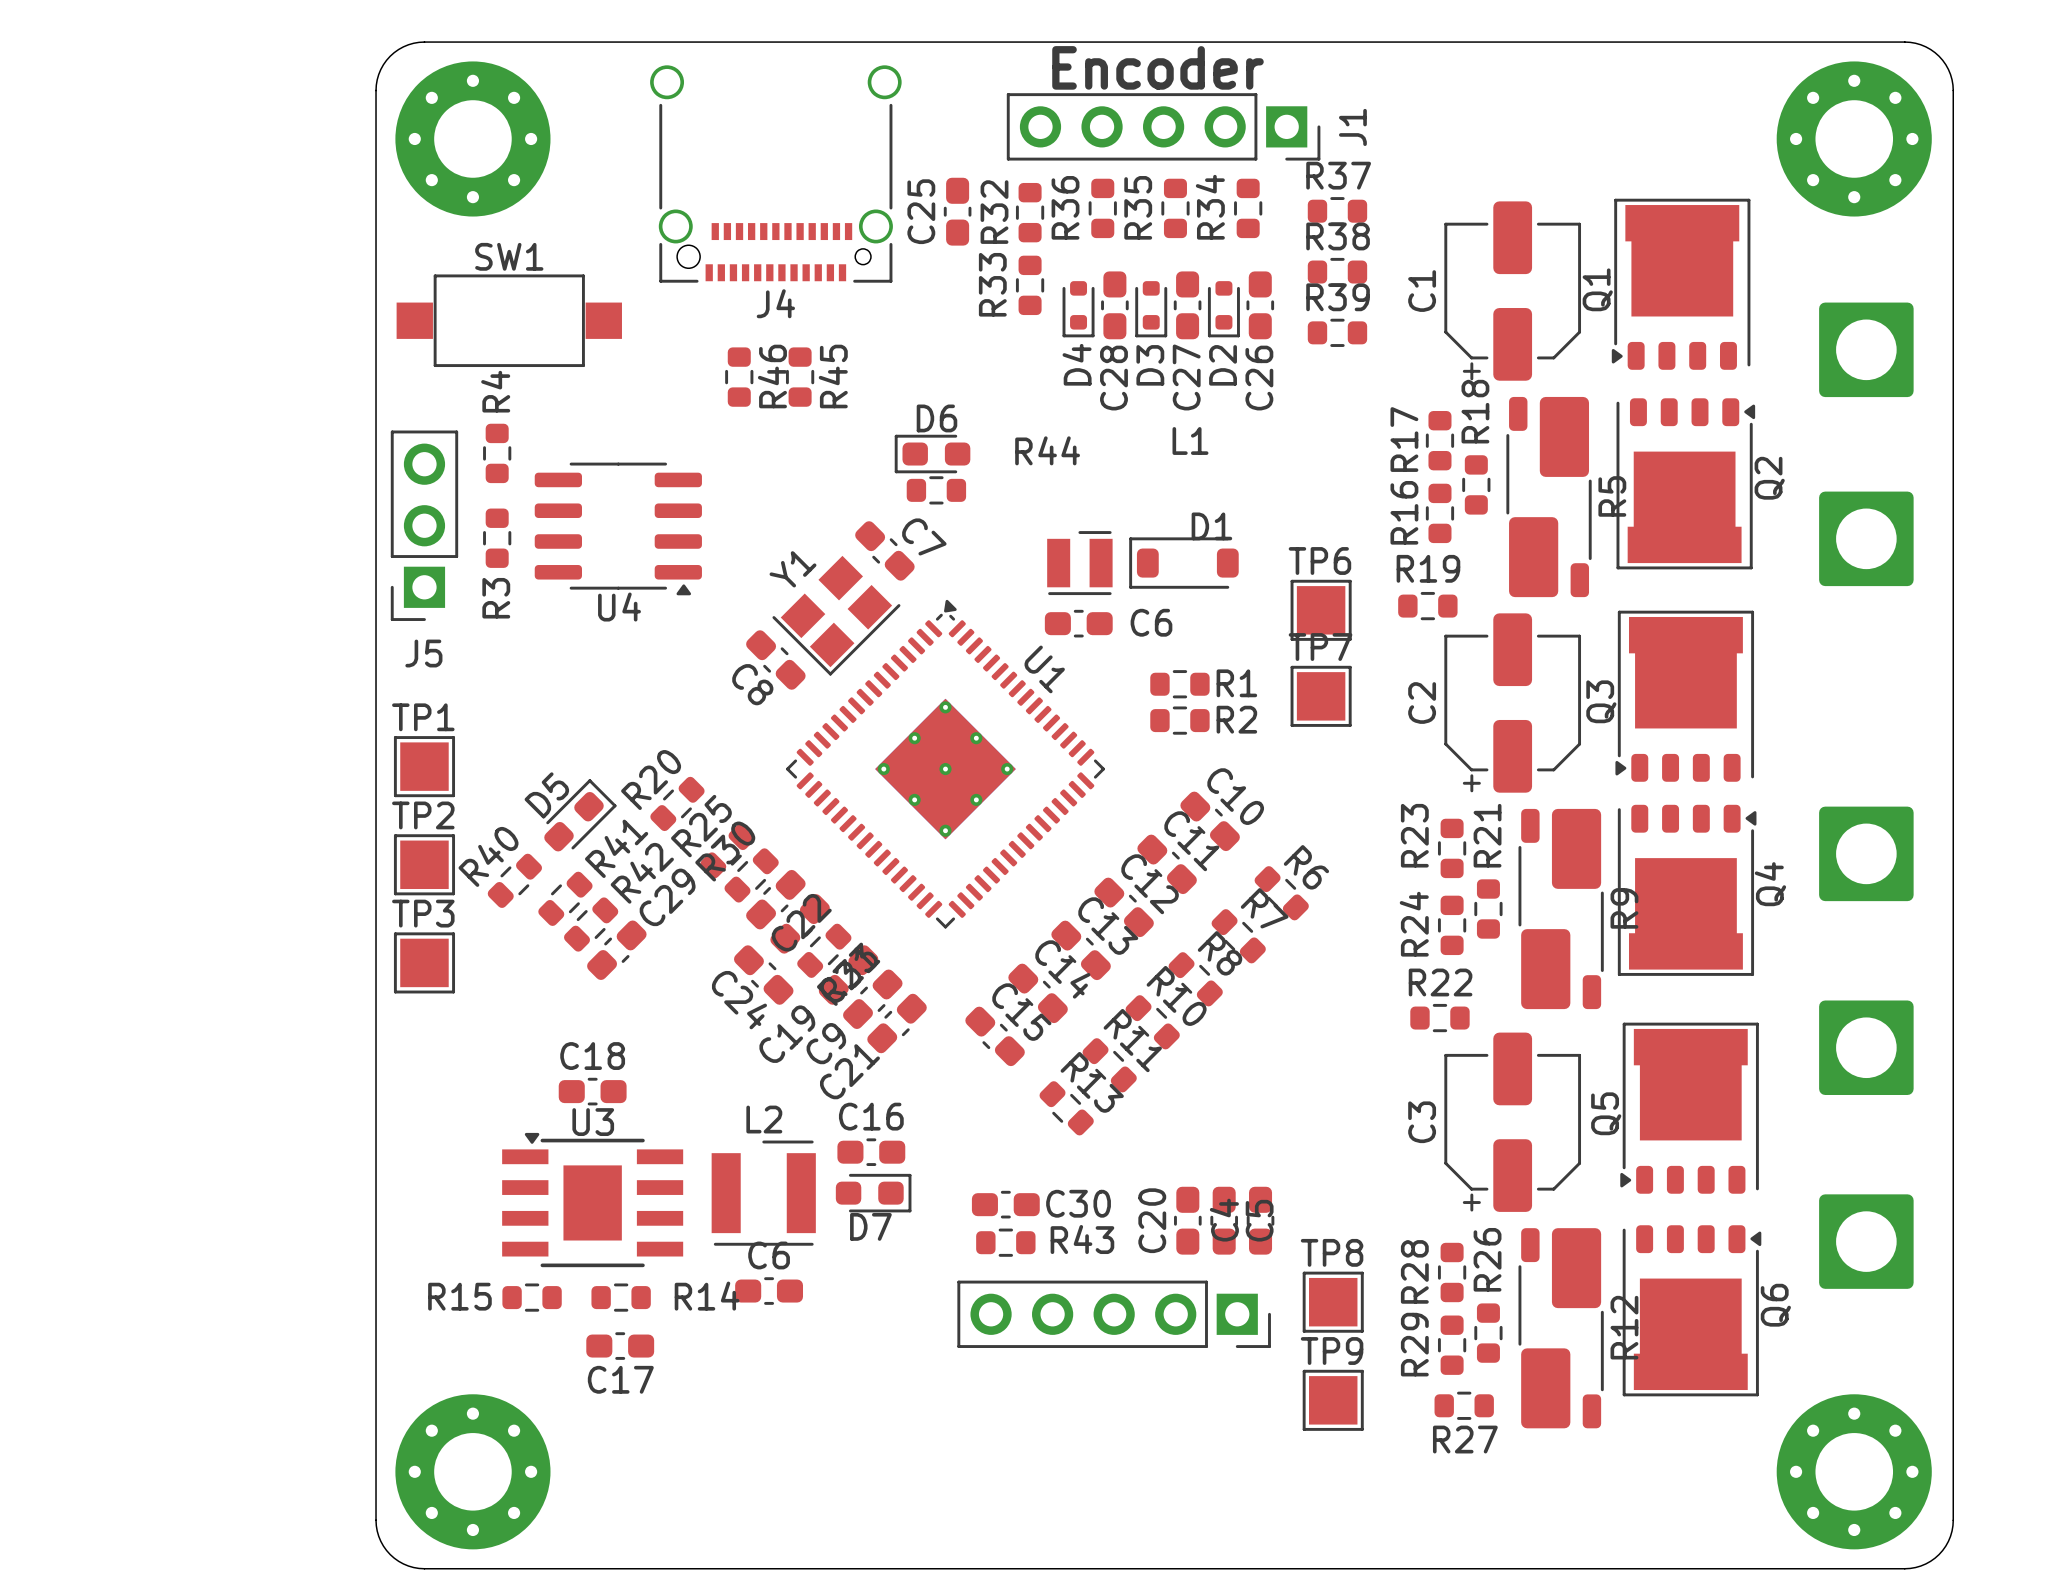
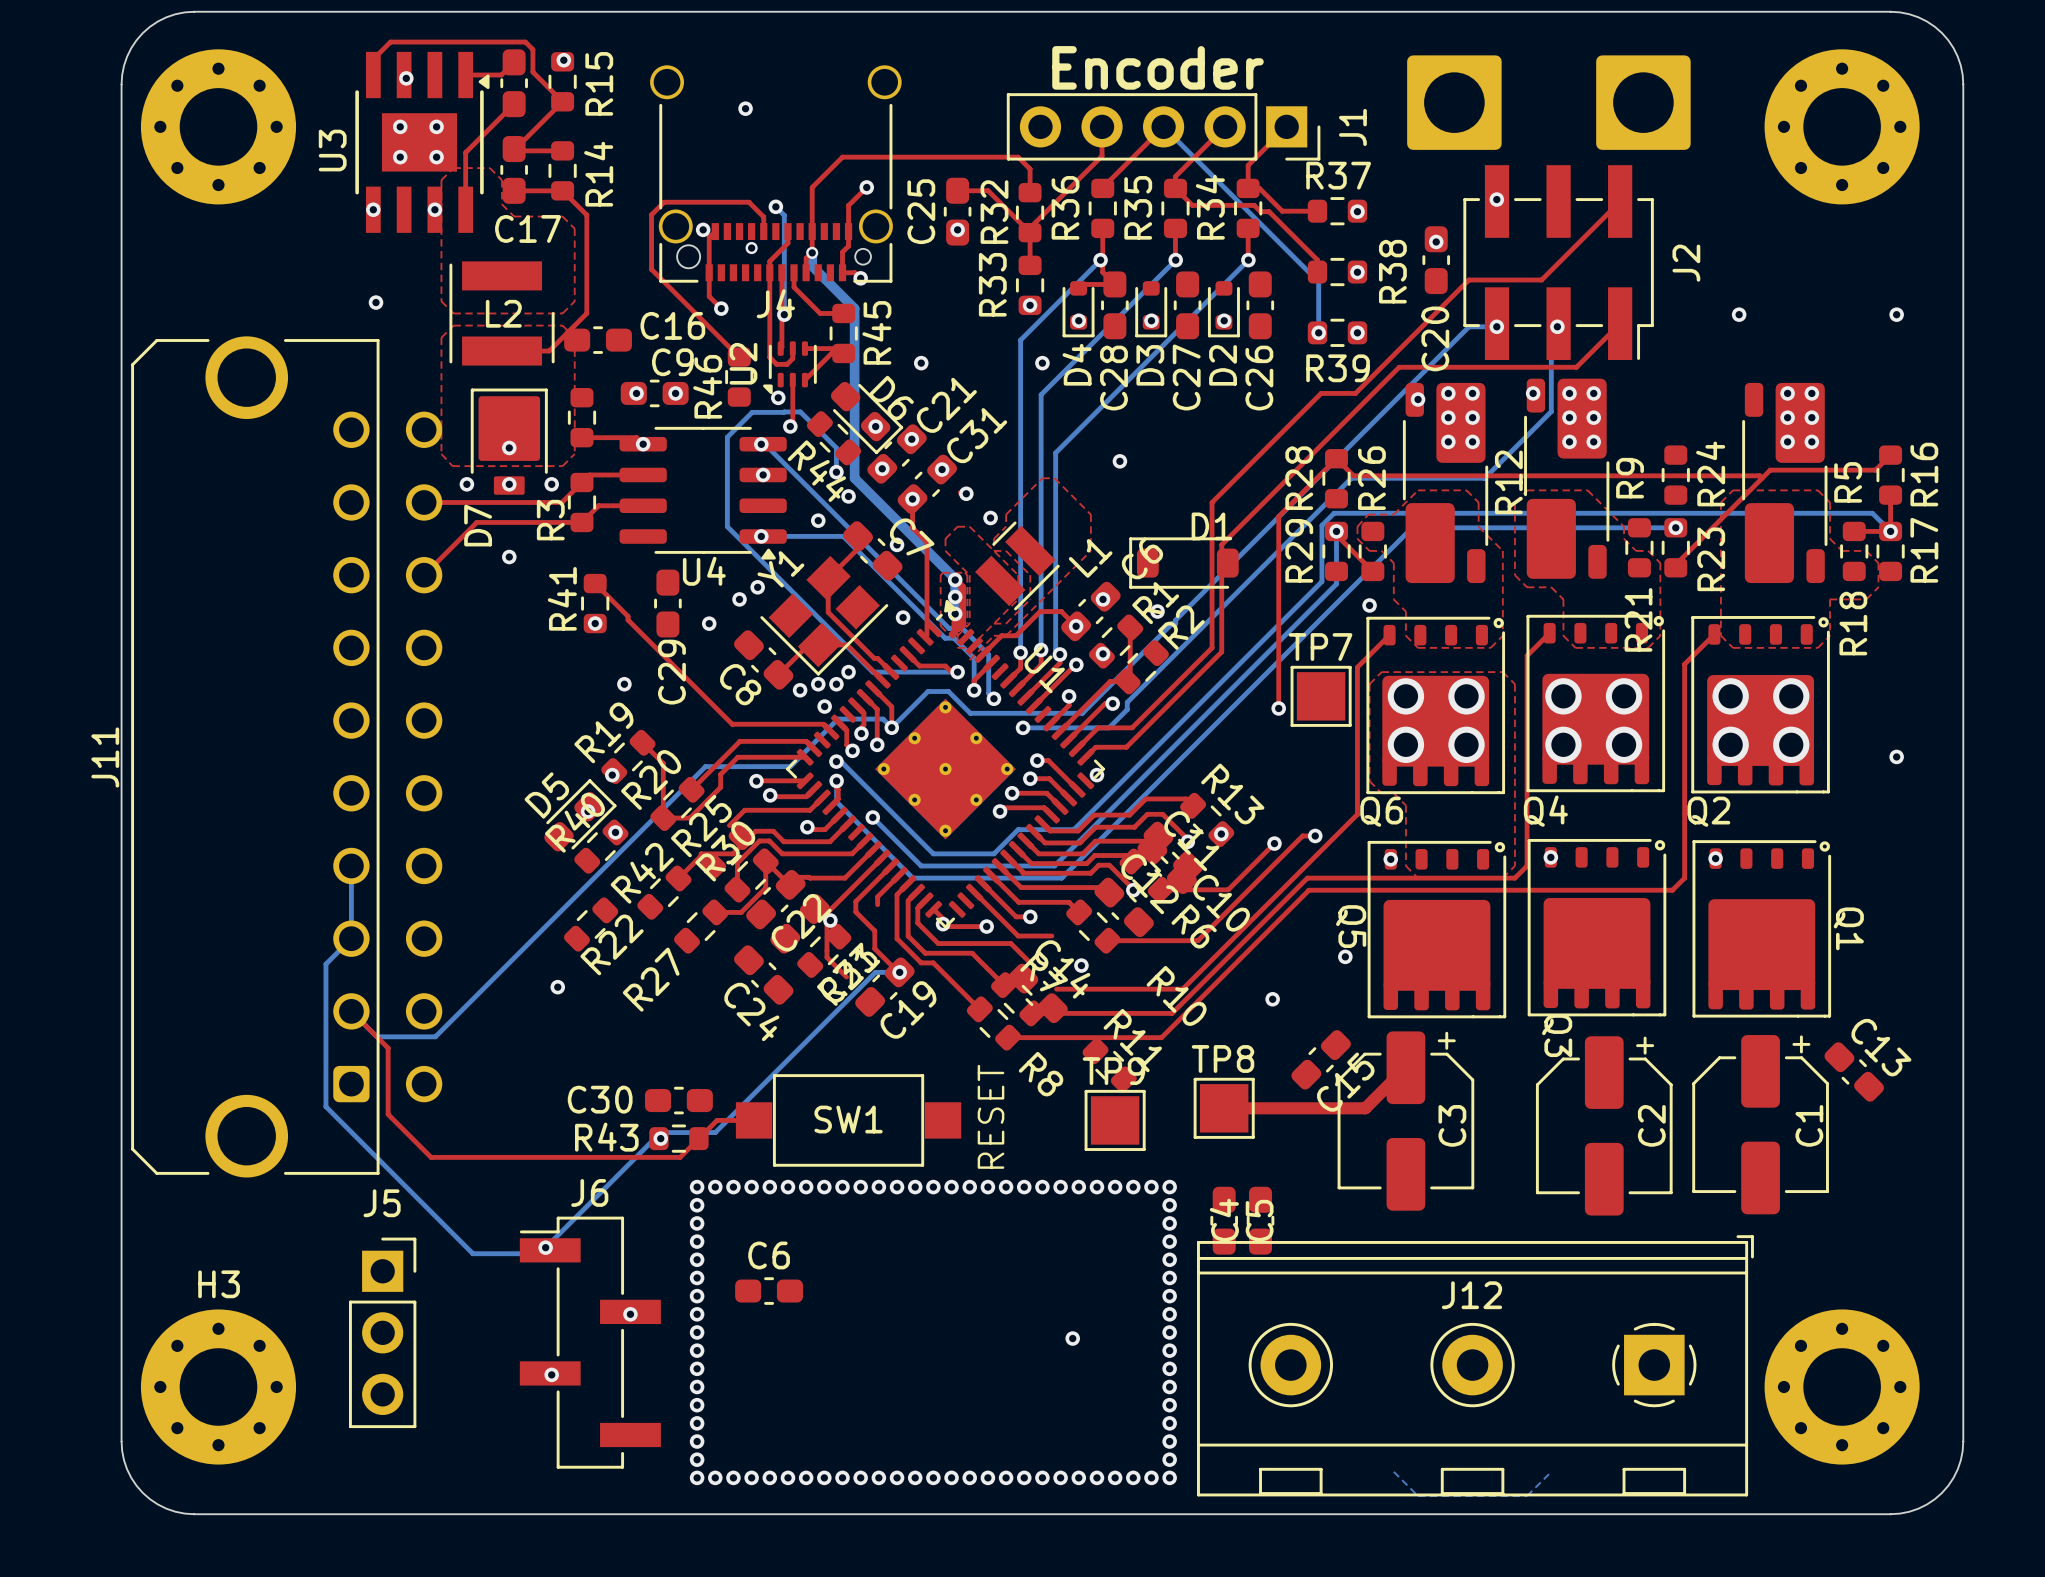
board edge: (424, 42) (1904, 42) (1925, 46) (1939, 56) (1950, 74) (1953, 90) (1953, 1520) (1948, 1541) (1939, 1554) (1925, 1563) (1904, 1568) (424, 1568) (403, 1563) (390, 1554) (380, 1541) (376, 1520) (376, 90) (380, 69) (390, 56) (403, 46) (424, 42) -> (194, 11) (166, 17) (142, 33) (127, 56) (121, 84) (121, 1441) (127, 1469) (136, 1485) (150, 1499) (166, 1508) (194, 1514) (1890, 1514) (1918, 1508) (1934, 1499) (1948, 1485) (1957, 1469) (1963, 1441) (1963, 84) (1960, 65) (1953, 48) (1934, 26) (1909, 14) (1890, 11) (194, 11)
via: none -> (563, 60)
top track: none -> (514, 62) (501, 75) (465, 75)
top track: none -> (373, 75) (373, 59) (390, 42) (525, 42) (532, 49) (532, 72) (562, 101) (514, 149) (515, 150) (562, 150)
via: none -> (406, 78)
part: none -> (514, 83)
part: none -> (1454, 102)
part: none -> (1643, 102)
top track: none -> (514, 104) (465, 152) (465, 209)
via: none -> (745, 108)
via: none -> (400, 126)
via: none -> (436, 126)
top track: none -> (1102, 126) (1102, 156) (1030, 227) (1030, 265)
top track: none -> (1163, 126) (1102, 188)
bottom track: none -> (1163, 126) (1318, 281) (1318, 332)
top track: none -> (1225, 126) (1175, 176) (1175, 188) (1192, 205) (1254, 205) (1260, 211) (1269, 211) (1317, 260) (1317, 272)
top track: none -> (1286, 126) (1248, 165) (1248, 188) (1259, 188) (1282, 211) (1317, 211)
part position: (472, 138) -> (218, 126)
part position: (1854, 138) -> (1842, 126)
via: none -> (400, 157)
via: none -> (436, 157)
top zone outline: none -> (453, 168) (489, 168) (502, 180) (502, 204) (514, 216) (562, 216) (574, 228) (574, 301) (562, 313) (453, 313) (441, 301) (441, 180) (453, 168)
top track: none -> (866, 187) (848, 205) (848, 246) (842, 252) (842, 272) (855, 272) (860, 278)
via: none -> (866, 187)
top track: none -> (514, 190) (562, 190) (586, 215) (586, 313) (549, 351) (502, 351)
top track: none -> (957, 190) (988, 190) (1030, 232)
top track: none -> (1030, 192) (1030, 169) (1018, 157) (842, 157) (812, 187) (812, 252) (806, 258) (806, 272)
Q1 footprint: [1611, 198, 1751, 370] -> [1692, 840, 1832, 1018]
via: none -> (1496, 199)
top track: none -> (1620, 201) (1541, 280) (1468, 280) (1355, 393) (1321, 393) (1212, 502) (1212, 647) (1132, 727) (1098, 727) (1077, 748)
bottom track: none -> (775, 206) (784, 215) (784, 314)
via: none -> (775, 206)
via: none -> (373, 209)
via: none -> (434, 209)
via: none -> (1357, 211)
top track: none -> (1102, 228) (1102, 257) (1100, 260) (1102, 262) (1102, 272) (1114, 284) (1082, 284) (1078, 288)
top track: none -> (1175, 228) (1175, 259)
top track: none -> (1248, 228) (1248, 259)
via: none -> (703, 229)
via: none -> (957, 229)
top track: none -> (715, 231) (709, 237) (709, 296) (721, 308)
top track: none -> (763, 231) (763, 217) (748, 202) (664, 202) (651, 214) (651, 269) (739, 357)
top track: none -> (787, 231) (787, 243) (769, 261) (769, 357) (776, 364) (787, 364) (792, 358) (792, 348)
R38 name rotation: 0° (1338, 236) -> 90° counterclockwise (1392, 271)
via: none -> (1436, 241)
via: none -> (751, 248)
bottom track: none -> (812, 252) (812, 266) (854, 308) (854, 478) (955, 578) (955, 613)
via: none -> (812, 252)
SW1 name position: SW1 (509, 256) -> SW1 (848, 1119)
bottom track: none -> (1100, 260) (1020, 340) (1020, 652)
via: none -> (1100, 260)
bottom track: none -> (1175, 260) (1041, 394) (1041, 649)
via: none -> (1175, 260)
bottom track: none -> (1248, 260) (1055, 452) (1055, 650) (1059, 654)
via: none -> (1248, 260)
J2: none -> (1558, 262)
top track: none -> (781, 272) (781, 312) (784, 314) (781, 317) (780, 348)
top track: none -> (794, 272) (794, 287) (820, 313) (843, 313)
via: none -> (1357, 272)
via: none -> (860, 278)
Q1 name position: Q1 (1597, 289) -> Q1 (1848, 928)
C1 rotation: 0° (1512, 291) -> 180° (1760, 1124)
C1 position: (1512, 291) -> (1760, 1124)
R39 name position: R39 (1338, 297) -> R39 (1338, 368)
via: none -> (376, 302)
via: none -> (1030, 305)
via: none -> (721, 308)
via: none -> (784, 314)
via: none -> (1739, 314)
via: none -> (1896, 314)
SW1 position: (509, 320) -> (848, 1120)
via: none -> (1078, 320)
via: none -> (1151, 320)
via: none -> (1224, 320)
top track: none -> (1620, 323) (1576, 367) (1399, 367) (1221, 544) (1221, 651) (1126, 747) (1095, 747) (1085, 757)
top zone outline: none -> (453, 325) (441, 337) (441, 454) (452, 466) (562, 466) (574, 454) (574, 337) (562, 325) (453, 325)
bottom track: none -> (1496, 326) (1468, 326) (1175, 620) (1175, 623) (1172, 623) (1082, 713) (970, 713) (948, 691) (927, 691) (891, 727) (883, 719) (837, 719) (790, 766) (705, 766) (435, 1036) (376, 1036) (351, 1011)
via: none -> (1496, 326)
bottom track: none -> (1557, 326) (1551, 332) (1551, 411) (1484, 478) (1351, 478) (1127, 702) (1127, 709) (1109, 727) (1023, 727)
via: none -> (1557, 326)
via: none -> (1318, 332)
via: none -> (1357, 332)
top track: none -> (804, 348) (838, 348) (843, 353) (831, 353) (804, 380)
part: (1866, 349) -> none
via: none -> (921, 363)
via: none -> (1042, 363)
U2: none -> (789, 367)
R46 name position: R46 (772, 376) -> R46 (707, 386)
R45 position: (800, 377) -> (843, 333)
top track: none -> (792, 380) (792, 423) (790, 426)
via: none -> (636, 393)
via: none -> (675, 393)
via: none -> (1448, 393)
via: none -> (1472, 393)
via: none -> (1533, 393)
via: none -> (1569, 393)
via: none -> (1593, 393)
via: none -> (1787, 393)
via: none -> (1811, 393)
via: none -> (778, 397)
Q2 footprint: [1616, 398, 1756, 570] -> [1691, 616, 1830, 794]
via: none -> (1418, 399)
R18 name position: R18 (1475, 411) -> R18 (1853, 623)
part: none -> (581, 417)
via: none -> (1448, 417)
via: none -> (1472, 417)
via: none -> (1569, 417)
via: none -> (1593, 417)
via: none -> (1787, 417)
via: none -> (1811, 417)
via: none -> (790, 426)
via: none -> (875, 426)
top track: none -> (581, 437) (636, 437) (643, 444)
via: none -> (911, 439)
R17 name position: R17 (1404, 439) -> R17 (1924, 550)
L1 name position: L1 (1190, 440) -> L1 (1090, 558)
R17 position: (1439, 440) -> (1890, 551)
via: none -> (1448, 441)
via: none -> (1472, 441)
via: none -> (1569, 441)
via: none -> (1593, 441)
via: none -> (1787, 441)
via: none -> (1811, 441)
via: none -> (643, 444)
bottom track: none -> (761, 444) (764, 444) (949, 628) (962, 628) (988, 654) (988, 693) (993, 698)
via: none -> (761, 444)
via: none -> (509, 447)
R44 name position: R44 (1047, 450) -> R44 (816, 471)
R4: (497, 453) -> none
D6 rotation: 0° (932, 454) -> 135° counterclockwise (867, 417)
D6 position: (932, 454) -> (867, 417)
top track: none -> (1890, 455) (1875, 470) (1770, 470) (1675, 564) (1675, 567)
via: none -> (1119, 461)
via: none -> (882, 468)
via: none -> (942, 469)
bottom track: none -> (836, 472) (836, 447) (800, 411) (752, 412) (727, 437) (727, 526) (872, 672) (957, 672)
via: none -> (836, 472)
top track: none -> (643, 474) (589, 474) (562, 502) (424, 502)
via: none -> (763, 474)
top track: none -> (1762, 478) (1759, 475) (1353, 475) (1336, 458) (1278, 516) (1278, 708)
Q2 name position: Q2 (1769, 478) -> Q2 (1708, 811)
via: none -> (466, 484)
via: none -> (509, 484)
via: none -> (551, 484)
C31: none -> (927, 484)
R18 position: (1476, 484) -> (1854, 551)
R44 rotation: 0° (936, 490) -> 45° clockwise (834, 438)
R44 position: (936, 490) -> (834, 438)
top zone outline: none -> (1418, 490) (1466, 490) (1478, 502) (1478, 526) (1502, 550) (1502, 635) (1490, 647) (1418, 647) (1405, 635) (1405, 611) (1393, 599) (1393, 563) (1381, 550) (1369, 550) (1357, 538) (1357, 526) (1368, 514) (1393, 514) (1418, 490)
top zone outline: none -> (1527, 490) (1587, 490) (1624, 526) (1624, 538) (1636, 550) (1648, 550) (1660, 563) (1660, 635) (1648, 647) (1575, 647) (1563, 635) (1563, 599) (1551, 587) (1527, 587) (1514, 575) (1514, 502) (1527, 490)
top zone outline: none -> (1733, 490) (1720, 502) (1720, 635) (1733, 647) (1817, 647) (1830, 635) (1830, 599) (1866, 599) (1878, 587) (1878, 563) (1866, 550) (1842, 550) (1830, 538) (1830, 502) (1817, 490) (1733, 490)
via: none -> (966, 493)
top track: none -> (1890, 495) (1890, 531) (1854, 531)
via: none -> (848, 496)
R5 position: (1549, 497) -> (1784, 482)
top track: none -> (912, 499) (912, 527) (927, 542) (927, 635)
via: none -> (912, 499)
top track: none -> (643, 505) (598, 505) (581, 522) (476, 522) (424, 575)
R16 name position: R16 (1404, 512) -> R16 (1924, 474)
R16 position: (1439, 513) -> (1890, 475)
via: none -> (990, 517)
via: none -> (818, 520)
J5 rotation: 0° (424, 525) -> 180° (382, 1332)
J5 position: (424, 525) -> (382, 1332)
bottom track: none -> (1675, 527) (1412, 527) (1061, 878) (912, 878) (836, 801) (836, 780)
via: none -> (1675, 527)
U4 position: (618, 528) -> (703, 493)
top track: none -> (1336, 531) (1336, 535) (1372, 571)
bottom track: none -> (1336, 531) (1336, 584) (1054, 865) (921, 865) (872, 817)
via: none -> (1336, 531)
bottom track: none -> (1890, 531) (1872, 513) (1334, 513) (1321, 525) (1321, 581) (1073, 829) (1018, 829) (993, 853) (933, 853) (841, 761) (836, 761)
via: none -> (1890, 531)
bottom track: none -> (761, 536) (843, 536) (945, 638) (953, 638) (974, 658) (974, 690)
via: none -> (761, 536)
top track: none -> (858, 536) (858, 548) (828, 578) (828, 612) (874, 658) (877, 658) (890, 671)
R3 position: (497, 538) -> (581, 502)
part: (1866, 538) -> none
via: none -> (897, 544)
C7 position: (884, 550) -> (872, 550)
via: none -> (509, 557)
L1 rotation: 0° (1079, 563) -> 45° counterclockwise (1017, 565)
L1 position: (1079, 563) -> (1017, 565)
top zone outline: none -> (943, 572) (964, 572) (967, 575) (967, 623) (952, 638) (940, 626) (940, 575) (943, 572)
top track: none -> (955, 580) (962, 587) (962, 623) (957, 628) (955, 626) (955, 613)
via: none -> (955, 580)
top track: none -> (595, 583) (628, 616) (628, 620) (732, 724) (823, 724) (830, 731)
via: none -> (757, 587)
via: none -> (955, 596)
R3 name position: R3 (496, 598) -> R3 (550, 520)
via: none -> (739, 599)
via: none -> (1103, 599)
via: none -> (1369, 605)
R19 rotation: 0° (1427, 606) -> 45° counterclockwise (628, 756)
R19 position: (1427, 606) -> (628, 756)
TP6: (1321, 610) -> none
Q3 footprint: [1615, 610, 1755, 782] -> [1527, 838, 1667, 1017]
via: none -> (1157, 611)
via: none -> (955, 613)
Y1 position: (836, 615) -> (824, 615)
via: none -> (903, 617)
via: none -> (595, 623)
via: none -> (709, 623)
top zone outline: none -> (993, 623) (1006, 623) (1030, 599) (1030, 575) (1006, 550) (993, 550) (993, 538) (1006, 526) (1006, 514) (1042, 478) (1054, 478) (1090, 514) (1090, 550) (1006, 635) (993, 635) (969, 660) (969, 647)
C6 rotation: 0° (1078, 623) -> 45° counterclockwise (1090, 611)
top track: none -> (1076, 626) (1061, 611) (1040, 611) (1015, 635) (1001, 635) (982, 654)
via: none -> (1076, 626)
top track: none -> (1130, 627) (1130, 676) (1127, 681) (1110, 681) (1060, 731)
top track: none -> (1549, 633) (1527, 655) (1527, 865) (1514, 878) (1307, 878) (1172, 1013) (1032, 1013)
top track: none -> (1714, 634) (1684, 664) (1684, 878) (1672, 890) (1308, 890) (1161, 1037) (1008, 1037)
top track: none -> (1389, 635) (1357, 667) (1357, 814) (1182, 989) (1056, 989)
top zone outline: none -> (969, 647) (957, 647) (957, 635) (969, 623) (969, 575) (945, 550) (945, 538) (957, 526) (969, 526) (1018, 575) (1018, 599) (969, 647)
top track: none -> (1041, 649) (1041, 664) (1017, 688)
via: none -> (1041, 649)
top track: none -> (1020, 652) (1020, 668) (1008, 680)
via: none -> (1020, 652)
via: none -> (1103, 653)
top track: none -> (908, 654) (919, 666) (945, 666) (951, 672) (957, 672)
top track: none -> (1059, 654) (1059, 663) (1025, 697)
via: none -> (1059, 654)
C8 position: (775, 660) -> (763, 660)
top track: none -> (991, 663) (974, 680) (974, 690)
top track: none -> (1076, 664) (1034, 705)
via: none -> (1076, 664)
via: none -> (848, 672)
via: none -> (957, 672)
top zone outline: none -> (1381, 672) (1502, 672) (1514, 684) (1514, 865) (1502, 878) (1418, 878) (1405, 865) (1405, 805) (1393, 793) (1381, 793) (1369, 781) (1369, 684) (1381, 672)
top track: none -> (778, 674) (808, 644) (847, 644) (882, 680)
via: none -> (624, 684)
via: none -> (818, 684)
via: none -> (836, 684)
R1 rotation: 0° (1179, 684) -> 45° counterclockwise (1116, 641)
R1 position: (1179, 684) -> (1116, 641)
top track: none -> (873, 688) (891, 706) (891, 727)
via: none -> (800, 690)
via: none -> (974, 690)
top track: none -> (1069, 696) (1069, 705) (1051, 723)
via: none -> (1069, 696)
via: none -> (1405, 696)
via: none -> (1466, 696)
via: none -> (1563, 696)
via: none -> (1624, 696)
via: none -> (1730, 696)
via: none -> (1791, 696)
top track: none -> (865, 697) (877, 709) (877, 744)
via: none -> (993, 698)
Q3 name position: Q3 (1601, 701) -> Q3 (1557, 1035)
top track: none -> (1112, 703) (1105, 703) (1068, 740)
via: none -> (1112, 703)
C2 rotation: 0° (1512, 703) -> 180° (1604, 1125)
C2 position: (1512, 703) -> (1604, 1125)
top track: none -> (856, 705) (863, 713) (861, 733)
via: none -> (824, 706)
via: none -> (1278, 708)
R2 rotation: 0° (1179, 720) -> 45° counterclockwise (1141, 667)
R2 position: (1179, 720) -> (1141, 667)
top track: none -> (839, 723) (846, 730) (846, 745) (852, 750)
via: none -> (891, 727)
via: none -> (1023, 727)
via: none -> (861, 733)
top track: none -> (642, 742) (663, 763) (663, 818) (689, 818) (720, 787) (720, 774) (737, 757) (805, 757)
via: none -> (877, 744)
via: none -> (1405, 744)
via: none -> (1466, 744)
via: none -> (1563, 744)
via: none -> (1624, 744)
via: none -> (1730, 744)
via: none -> (1791, 744)
top track: none -> (813, 748) (806, 741) (740, 741) (691, 789)
via: none -> (852, 750)
J11: none -> (286, 756)
via: none -> (1896, 756)
via: none -> (1037, 760)
via: none -> (836, 761)
top track: none -> (1036, 762) (1037, 760) (1048, 760) (1077, 789)
TP1: (424, 766) -> none
via: none -> (612, 775)
via: none -> (1096, 775)
top track: none -> (1030, 778) (1049, 778) (1068, 797)
via: none -> (1030, 778)
top track: none -> (756, 780) (805, 780)
top track: none -> (836, 780) (838, 799) (830, 806)
via: none -> (836, 780)
via: none -> (756, 781)
top track: none -> (813, 789) (806, 796) (770, 795) (771, 798)
top track: none -> (1012, 793) (1046, 793) (1060, 806)
via: none -> (1012, 793)
via: none -> (770, 795)
C10 name position: C10 (1235, 796) -> C10 (1221, 903)
top track: none -> (822, 797) (810, 810) (744, 810) (729, 825)
Q4 footprint: [1617, 804, 1757, 976] -> [1526, 614, 1666, 793]
top track: none -> (1193, 805) (1186, 798) (1145, 798) (1129, 815) (1094, 815) (1078, 830) (1050, 830) (1042, 823)
via: none -> (588, 811)
top track: none -> (1000, 811) (1003, 807) (1044, 807) (1051, 815)
via: none -> (1000, 811)
top track: none -> (839, 815) (824, 829) (807, 827) (812, 829)
via: none -> (872, 817)
C10 position: (1210, 821) -> (1173, 851)
top track: none -> (848, 823) (829, 841) (783, 841) (773, 831) (755, 831) (732, 853) (701, 853) (678, 878)
via: none -> (807, 827)
via: none -> (615, 832)
top track: none -> (1034, 832) (1045, 842) (1079, 842) (1095, 827) (1134, 827) (1147, 814) (1162, 814) (1188, 841)
via: none -> (1221, 834)
top track: none -> (1315, 835) (1302, 835) (1197, 940) (1107, 940)
via: none -> (1315, 835)
R23 name position: R23 (1414, 835) -> R23 (1711, 559)
R21 name position: R21 (1487, 835) -> R21 (1638, 619)
top track: none -> (1158, 836) (1153, 841) (1095, 841) (1082, 853) (1038, 853) (1025, 840)
top track: none -> (865, 840) (852, 853) (782, 853) (769, 840) (759, 840) (737, 863) (737, 889)
via: none -> (1187, 841)
top track: none -> (1274, 843) (1228, 889) (1160, 889)
via: none -> (1274, 843)
R41 name position: R41 (616, 848) -> R41 (562, 598)
R23 position: (1452, 848) -> (1675, 547)
top track: none -> (873, 849) (845, 878) (782, 878) (765, 861) (765, 887) (741, 912) (715, 912)
top track: none -> (1017, 849) (1031, 863) (1086, 863) (1094, 855) (1126, 855) (1132, 861)
part: (1866, 853) -> none
top track: none -> (882, 857) (826, 913) (826, 957) (846, 977)
top track: none -> (1008, 857) (1023, 873) (1090, 873) (1098, 865) (1109, 865) (1134, 890)
via: none -> (1550, 857)
via: none -> (1715, 858)
via: none -> (1390, 859)
TP2: (424, 864) -> none
bottom track: none -> (351, 865) (351, 938) (325, 964) (325, 1106) (472, 1253) (539, 1253) (654, 1138) (660, 1138) (666, 1132) (715, 1132) (875, 972) (899, 972)
top track: none -> (890, 866) (855, 901) (855, 912) (874, 931) (874, 948) (899, 972)
top track: none -> (1000, 866) (1021, 887) (1105, 887)
R6 name position: R6 (1306, 867) -> R6 (1194, 926)
top track: none -> (899, 875) (877, 896) (877, 904)
top track: none -> (991, 875) (1018, 902) (1069, 902) (1079, 912)
R40 position: (514, 880) -> (601, 846)
top track: none -> (908, 883) (897, 894) (897, 938) (921, 962) (933, 962) (979, 1009)
top track: none -> (982, 883) (1016, 916) (1030, 916)
Q4 name position: Q4 (1770, 884) -> Q4 (1545, 811)
via: none -> (1133, 890)
top track: none -> (916, 892) (908, 900) (908, 936) (925, 953) (972, 953) (1004, 985)
top track: none -> (974, 892) (1018, 936) (1051, 936)
R6 position: (1281, 893) -> (1146, 875)
C29 name position: C29 (667, 897) -> C29 (671, 672)
R41 rotation: 0° (565, 898) -> 45° counterclockwise (595, 603)
R41 position: (565, 898) -> (595, 603)
top track: none -> (925, 900) (917, 908) (917, 923) (938, 943) (1010, 943) (1028, 960)
top track: none -> (933, 909) (943, 918) (943, 924) (945, 926) (986, 926)
R21 position: (1488, 909) -> (1639, 547)
R9 position: (1561, 909) -> (1566, 478)
via: none -> (1030, 916)
via: none -> (830, 920)
via: none -> (943, 924)
R24 name position: R24 (1414, 924) -> R24 (1710, 473)
R24 position: (1452, 925) -> (1675, 475)
via: none -> (986, 926)
R7 position: (1238, 936) -> (1018, 999)
C29 rotation: 0° (616, 950) -> 45° counterclockwise (667, 603)
C29 position: (616, 950) -> (667, 603)
C13 position: (1081, 950) -> (1854, 1071)
R8 name position: R8 (1220, 953) -> R8 (1041, 1074)
via: none -> (1345, 956)
TP3: (424, 962) -> none
via: none -> (1081, 965)
via: none -> (899, 972)
C19 position: (848, 975) -> (884, 987)
R8 position: (1195, 979) -> (993, 1023)
R22 name position: R22 (1440, 982) -> R22 (612, 944)
via: none -> (557, 987)
C9 rotation: 0° (872, 999) -> 45° clockwise (654, 393)
C9 position: (872, 999) -> (654, 393)
via: none -> (1272, 999)
C24 name position: C24 (739, 1000) -> C24 (751, 1011)
top track: none -> (351, 1011) (388, 1048) (388, 1114) (431, 1157) (680, 1157) (717, 1120) (754, 1120)
R22 rotation: 0° (1439, 1018) -> 45° counterclockwise (664, 892)
R22 position: (1439, 1018) -> (664, 892)
R10 position: (1152, 1022) -> (1093, 926)
Q5 footprint: [1620, 1022, 1759, 1194] -> [1367, 840, 1507, 1019]
C21 position: (897, 1023) -> (897, 454)
C19 name position: C19 (787, 1034) -> C19 (908, 1009)
C15 rotation: 0° (995, 1036) -> 90° clockwise (1321, 1059)
C15 position: (995, 1036) -> (1321, 1059)
C9 name position: C9 (826, 1043) -> C9 (672, 362)
part: (1866, 1047) -> none
top track: none -> (1405, 1067) (1365, 1108) (1224, 1108)
C21 name position: C21 (849, 1071) -> C21 (946, 405)
C18: (592, 1091) -> none
R13 position: (1066, 1108) -> (1207, 819)
C16 name position: C16 (871, 1116) -> C16 (672, 325)
text: none -> RESET (990, 1116)
L2 name position: L2 (764, 1119) -> L2 (503, 313)
U3 name position: U3 (593, 1122) -> U3 (332, 150)
C3 rotation: 0° (1512, 1122) -> 180° (1405, 1121)
via: none -> (660, 1138)
C16 position: (871, 1152) -> (598, 340)
D7 footprint: [835, 1173, 912, 1213] -> [470, 388, 548, 495]
via: none -> (697, 1187)
via: none -> (715, 1187)
via: none -> (733, 1187)
via: none -> (751, 1187)
via: none -> (769, 1187)
via: none -> (787, 1187)
via: none -> (806, 1187)
via: none -> (824, 1187)
via: none -> (842, 1187)
via: none -> (860, 1187)
via: none -> (878, 1187)
via: none -> (897, 1187)
via: none -> (915, 1187)
via: none -> (933, 1187)
via: none -> (951, 1187)
via: none -> (969, 1187)
via: none -> (987, 1187)
via: none -> (1006, 1187)
via: none -> (1024, 1187)
via: none -> (1042, 1187)
via: none -> (1060, 1187)
via: none -> (1078, 1187)
via: none -> (1096, 1187)
via: none -> (1115, 1187)
via: none -> (1133, 1187)
via: none -> (1151, 1187)
via: none -> (1169, 1187)
L2 rotation: 0° (763, 1193) -> 90° clockwise (502, 313)
L2 position: (763, 1193) -> (502, 313)
U3 rotation: 0° (592, 1200) -> 90° clockwise (422, 142)
U3 position: (592, 1200) -> (422, 142)
C30 name position: C30 (1078, 1203) -> C30 (600, 1099)
C30 position: (1005, 1204) -> (678, 1100)
via: none -> (697, 1205)
via: none -> (1169, 1205)
C20 name position: C20 (1152, 1220) -> C20 (1435, 338)
C20 position: (1187, 1220) -> (1436, 260)
via: none -> (697, 1223)
via: none -> (1169, 1223)
Q6 footprint: [1622, 1225, 1762, 1397] -> [1366, 616, 1506, 795]
D7 name position: D7 (870, 1226) -> D7 (478, 525)
R43 name position: R43 (1082, 1239) -> R43 (606, 1137)
via: none -> (697, 1241)
via: none -> (1169, 1241)
part: (1866, 1241) -> none
R43 position: (1005, 1242) -> (678, 1138)
via: none -> (545, 1247)
via: none -> (697, 1259)
via: none -> (1169, 1259)
R28 position: (1452, 1272) -> (1336, 478)
via: none -> (697, 1277)
via: none -> (1169, 1277)
R15 name position: R15 (459, 1296) -> R15 (599, 83)
via: none -> (697, 1296)
via: none -> (1169, 1296)
R15 rotation: 0° (532, 1297) -> 90° clockwise (562, 81)
R15 position: (532, 1297) -> (562, 81)
R14 rotation: 0° (621, 1297) -> 90° clockwise (562, 170)
R14 position: (621, 1297) -> (562, 170)
TP8 position: (1333, 1302) -> (1224, 1108)
Q6 name position: Q6 (1775, 1305) -> Q6 (1381, 811)
via: none -> (630, 1314)
via: none -> (697, 1314)
part: (1114, 1314) -> none
via: none -> (1169, 1314)
R12 position: (1561, 1328) -> (1445, 482)
via: none -> (697, 1332)
via: none -> (1169, 1332)
R26 position: (1488, 1333) -> (1372, 551)
via: none -> (1072, 1338)
J6: none -> (590, 1342)
R29 position: (1452, 1345) -> (1336, 551)
C17 rotation: 0° (620, 1346) -> 90° clockwise (514, 169)
C17 position: (620, 1346) -> (514, 169)
via: none -> (697, 1350)
via: none -> (1169, 1350)
J12: none -> (1475, 1365)
via: none -> (697, 1368)
via: none -> (1169, 1368)
via: none -> (551, 1374)
H3: none -> (218, 1387)
via: none -> (697, 1387)
via: none -> (1169, 1387)
TP9 position: (1333, 1400) -> (1115, 1120)
via: none -> (697, 1405)
via: none -> (1169, 1405)
R27 rotation: 0° (1464, 1405) -> 45° counterclockwise (701, 926)
R27 position: (1464, 1405) -> (701, 926)
via: none -> (697, 1423)
via: none -> (1169, 1423)
R27 name position: R27 (1465, 1439) -> R27 (651, 979)
via: none -> (697, 1441)
via: none -> (1169, 1441)
via: none -> (697, 1459)
via: none -> (1169, 1459)
part: (472, 1471) -> none
bottom zone outline: none -> (1393, 1471) (1418, 1496) (1527, 1496) (1551, 1471)
part position: (1854, 1471) -> (1842, 1387)
via: none -> (697, 1477)
via: none -> (715, 1477)
via: none -> (733, 1477)
via: none -> (751, 1477)
via: none -> (769, 1477)
via: none -> (787, 1477)
via: none -> (806, 1477)
via: none -> (824, 1477)
via: none -> (842, 1477)
via: none -> (860, 1477)
via: none -> (878, 1477)
via: none -> (897, 1477)
via: none -> (915, 1477)
via: none -> (933, 1477)
via: none -> (951, 1477)
via: none -> (969, 1477)
via: none -> (987, 1477)
via: none -> (1006, 1477)
via: none -> (1024, 1477)
via: none -> (1042, 1477)
via: none -> (1060, 1477)
via: none -> (1078, 1477)
via: none -> (1096, 1477)
via: none -> (1115, 1477)
via: none -> (1133, 1477)
via: none -> (1151, 1477)
via: none -> (1169, 1477)

